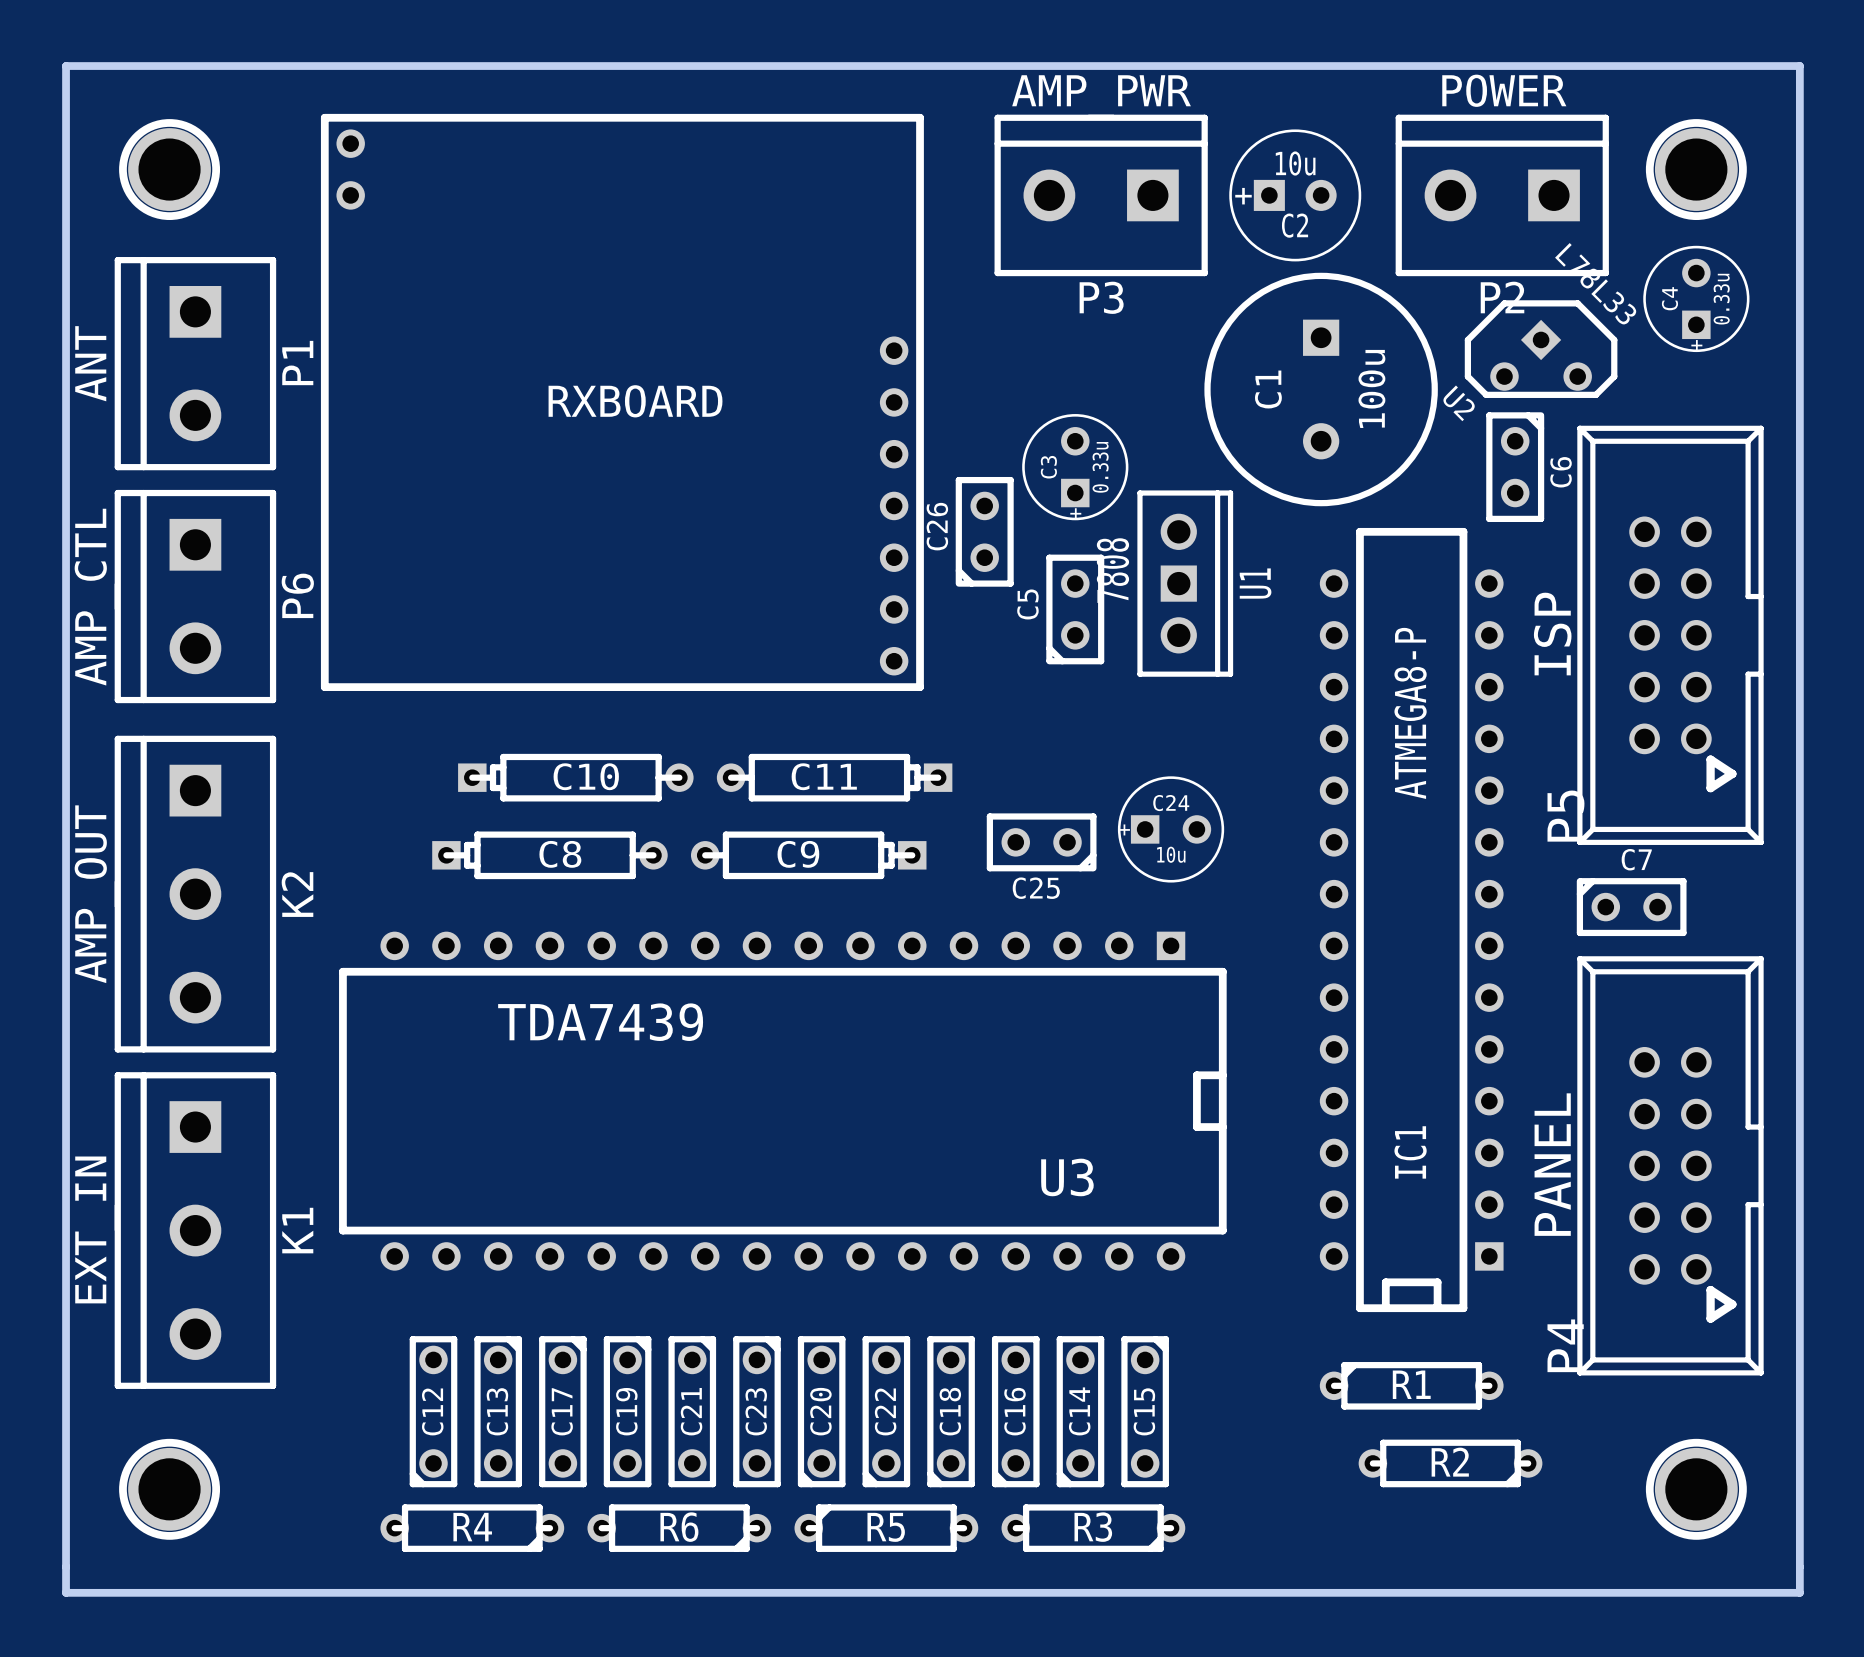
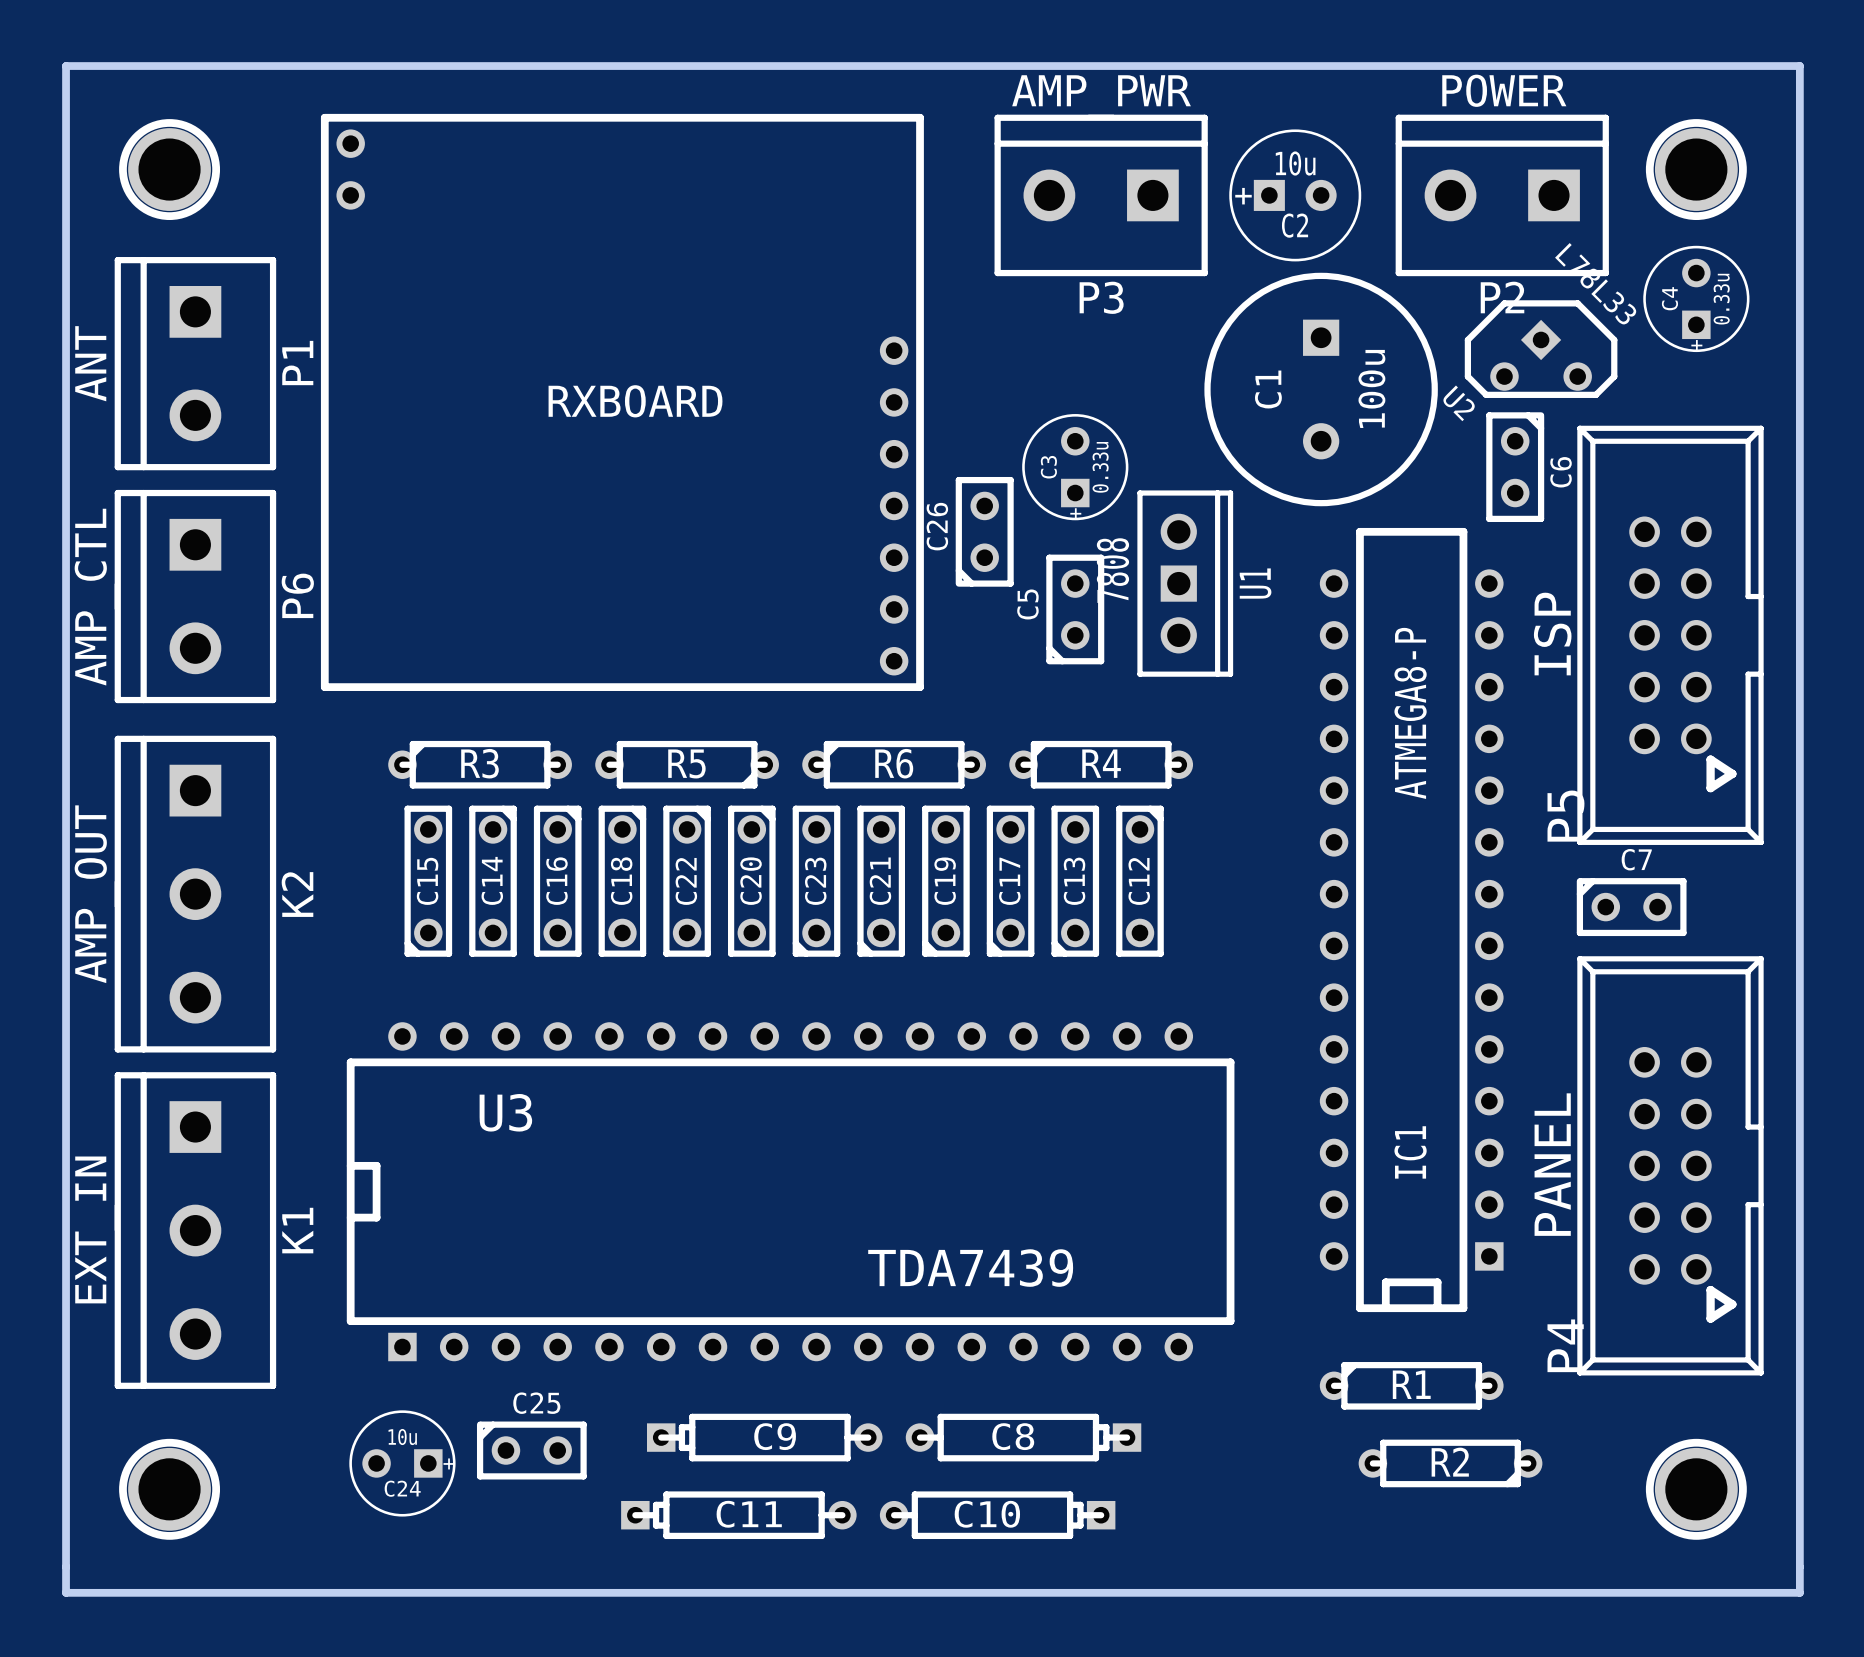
C10 rotation: 0° (575, 777) -> 180° (997, 1515)
C10 position: (575, 777) -> (997, 1515)
C11 rotation: 0° (834, 777) -> 180° (738, 1515)
C11 position: (834, 777) -> (738, 1515)
C24 rotation: 0° (1171, 829) -> 180° (402, 1463)
C24 position: (1171, 829) -> (402, 1463)
C25 rotation: 0° (1041, 842) -> 180° (531, 1450)
C25 position: (1041, 842) -> (531, 1450)
C8 rotation: 0° (549, 855) -> 180° (1023, 1437)
C8 position: (549, 855) -> (1023, 1437)
C9 rotation: 0° (808, 855) -> 180° (764, 1437)
C9 position: (808, 855) -> (764, 1437)
U3 rotation: 0° (782, 1101) -> 180° (790, 1191)
C12 rotation: 0° (433, 1411) -> 180° (1139, 881)
C12 position: (433, 1411) -> (1139, 881)
C13 rotation: 0° (498, 1411) -> 180° (1075, 881)
C13 position: (498, 1411) -> (1075, 881)
C17 rotation: 0° (562, 1411) -> 180° (1010, 881)
C17 position: (562, 1411) -> (1010, 881)
C19 rotation: 0° (627, 1411) -> 180° (945, 881)
C19 position: (627, 1411) -> (945, 881)
C21 rotation: 0° (692, 1411) -> 180° (881, 881)
C21 position: (692, 1411) -> (881, 881)
C23 rotation: 0° (756, 1411) -> 180° (816, 881)
C23 position: (756, 1411) -> (816, 881)
C20 rotation: 0° (821, 1411) -> 180° (751, 881)
C20 position: (821, 1411) -> (751, 881)
C22 rotation: 0° (886, 1411) -> 180° (687, 881)
C22 position: (886, 1411) -> (687, 881)
C18 rotation: 0° (951, 1411) -> 180° (622, 881)
C18 position: (951, 1411) -> (622, 881)
C16 rotation: 0° (1015, 1411) -> 180° (557, 881)
C16 position: (1015, 1411) -> (557, 881)
C14 rotation: 0° (1080, 1411) -> 180° (493, 881)
C14 position: (1080, 1411) -> (493, 881)
C15 rotation: 0° (1145, 1411) -> 180° (428, 881)
C15 position: (1145, 1411) -> (428, 881)
R4 rotation: 0° (472, 1528) -> 180° (1101, 764)
R4 position: (472, 1528) -> (1101, 764)
R6 rotation: 0° (679, 1528) -> 180° (894, 764)
R6 position: (679, 1528) -> (894, 764)
R5 rotation: 0° (886, 1528) -> 180° (687, 764)
R5 position: (886, 1528) -> (687, 764)
R3 rotation: 0° (1093, 1528) -> 180° (480, 764)
R3 position: (1093, 1528) -> (480, 764)

